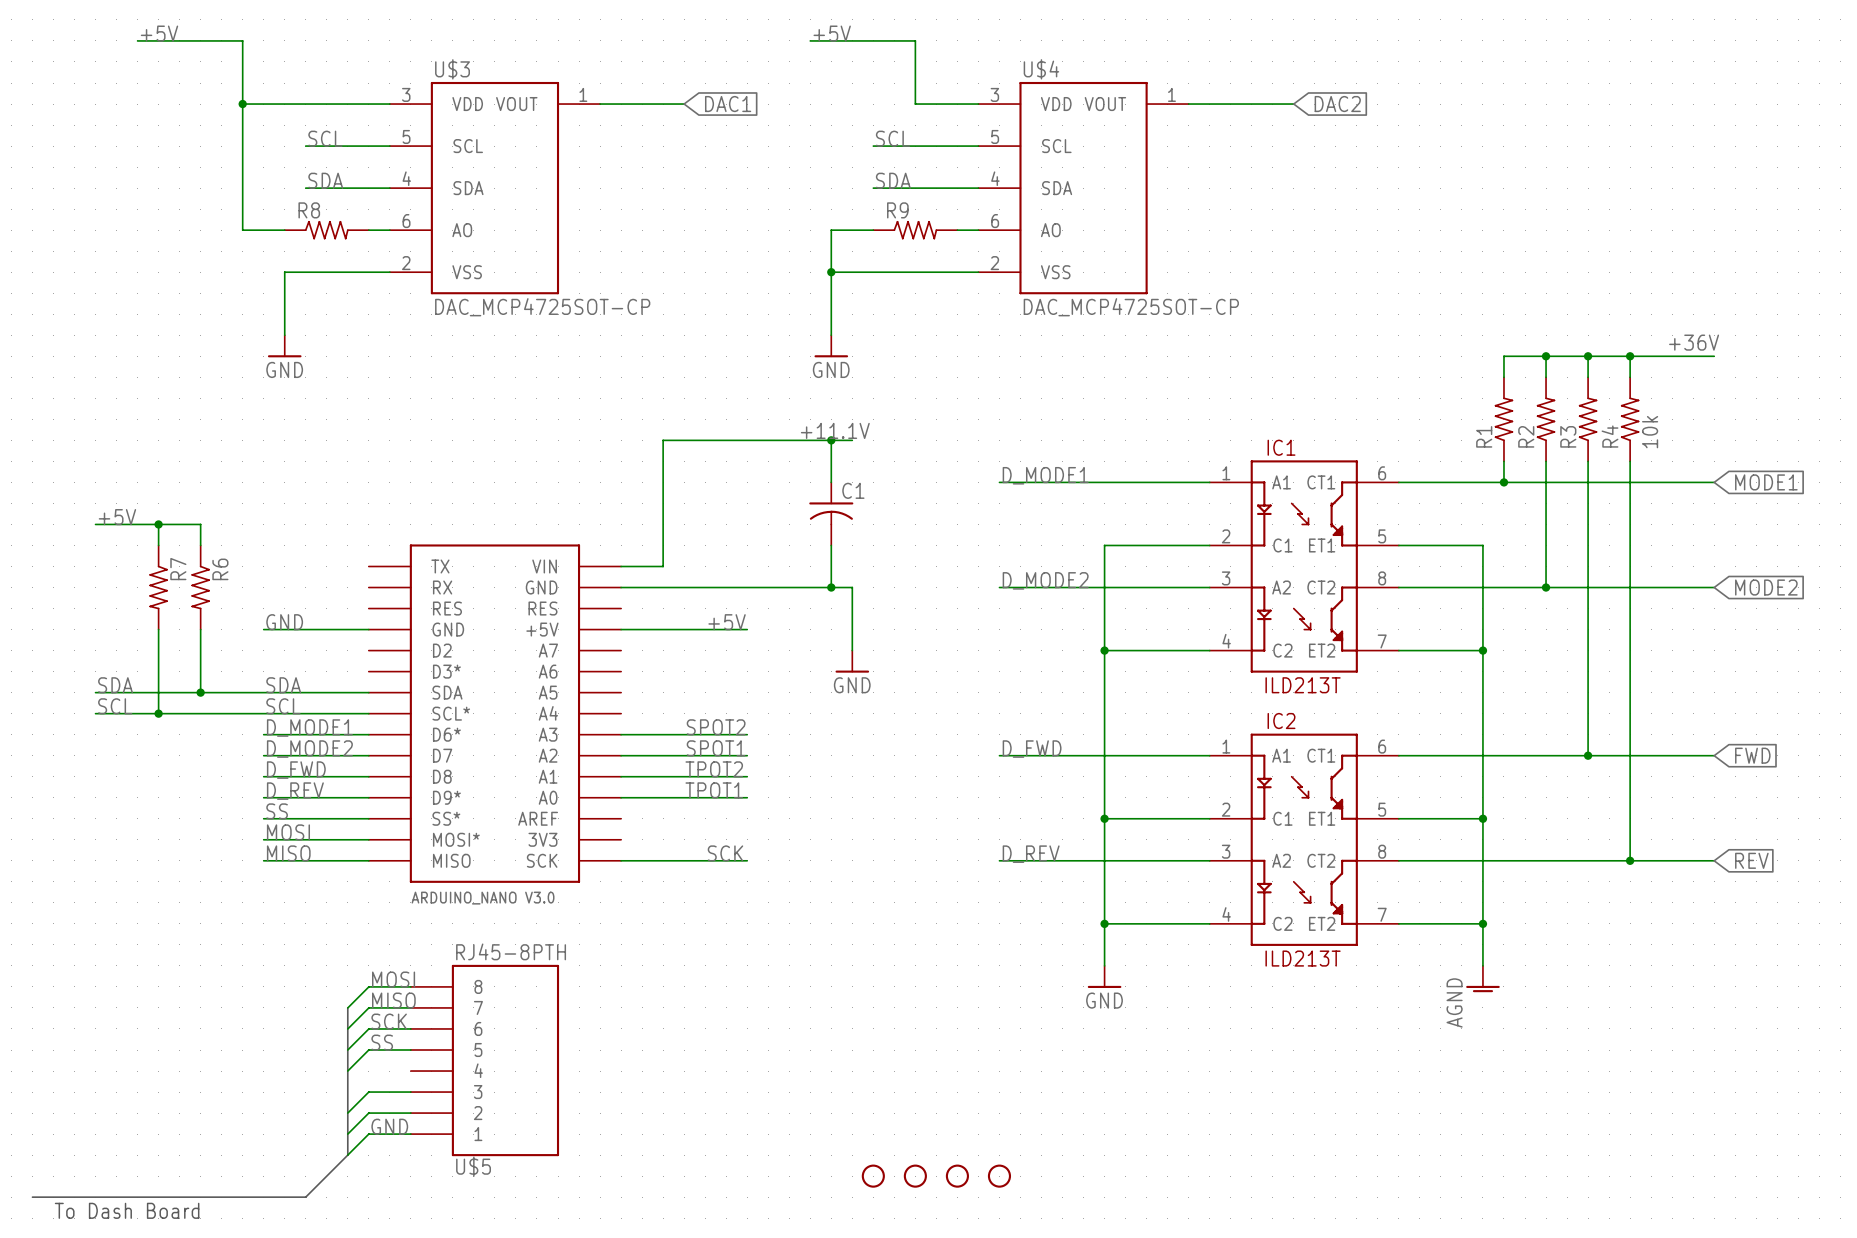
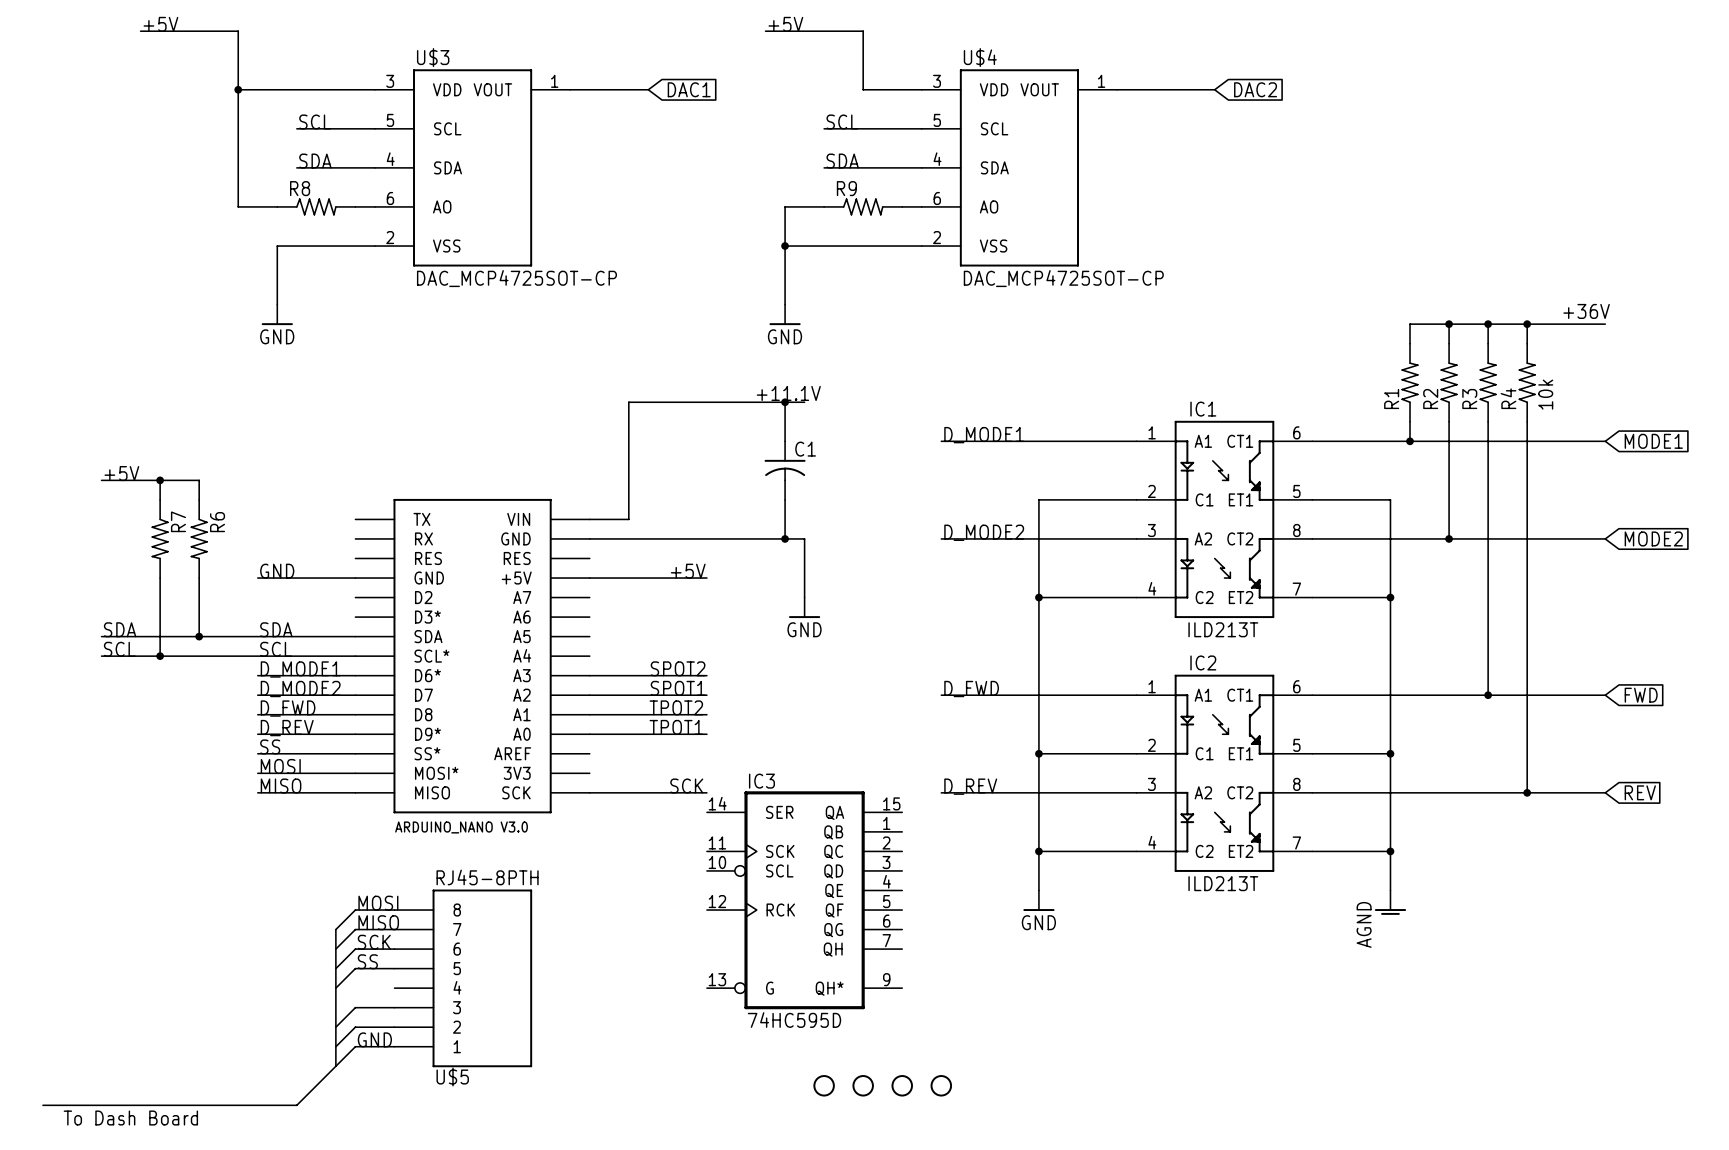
IC3: none -> 74HC595D (804, 900)

